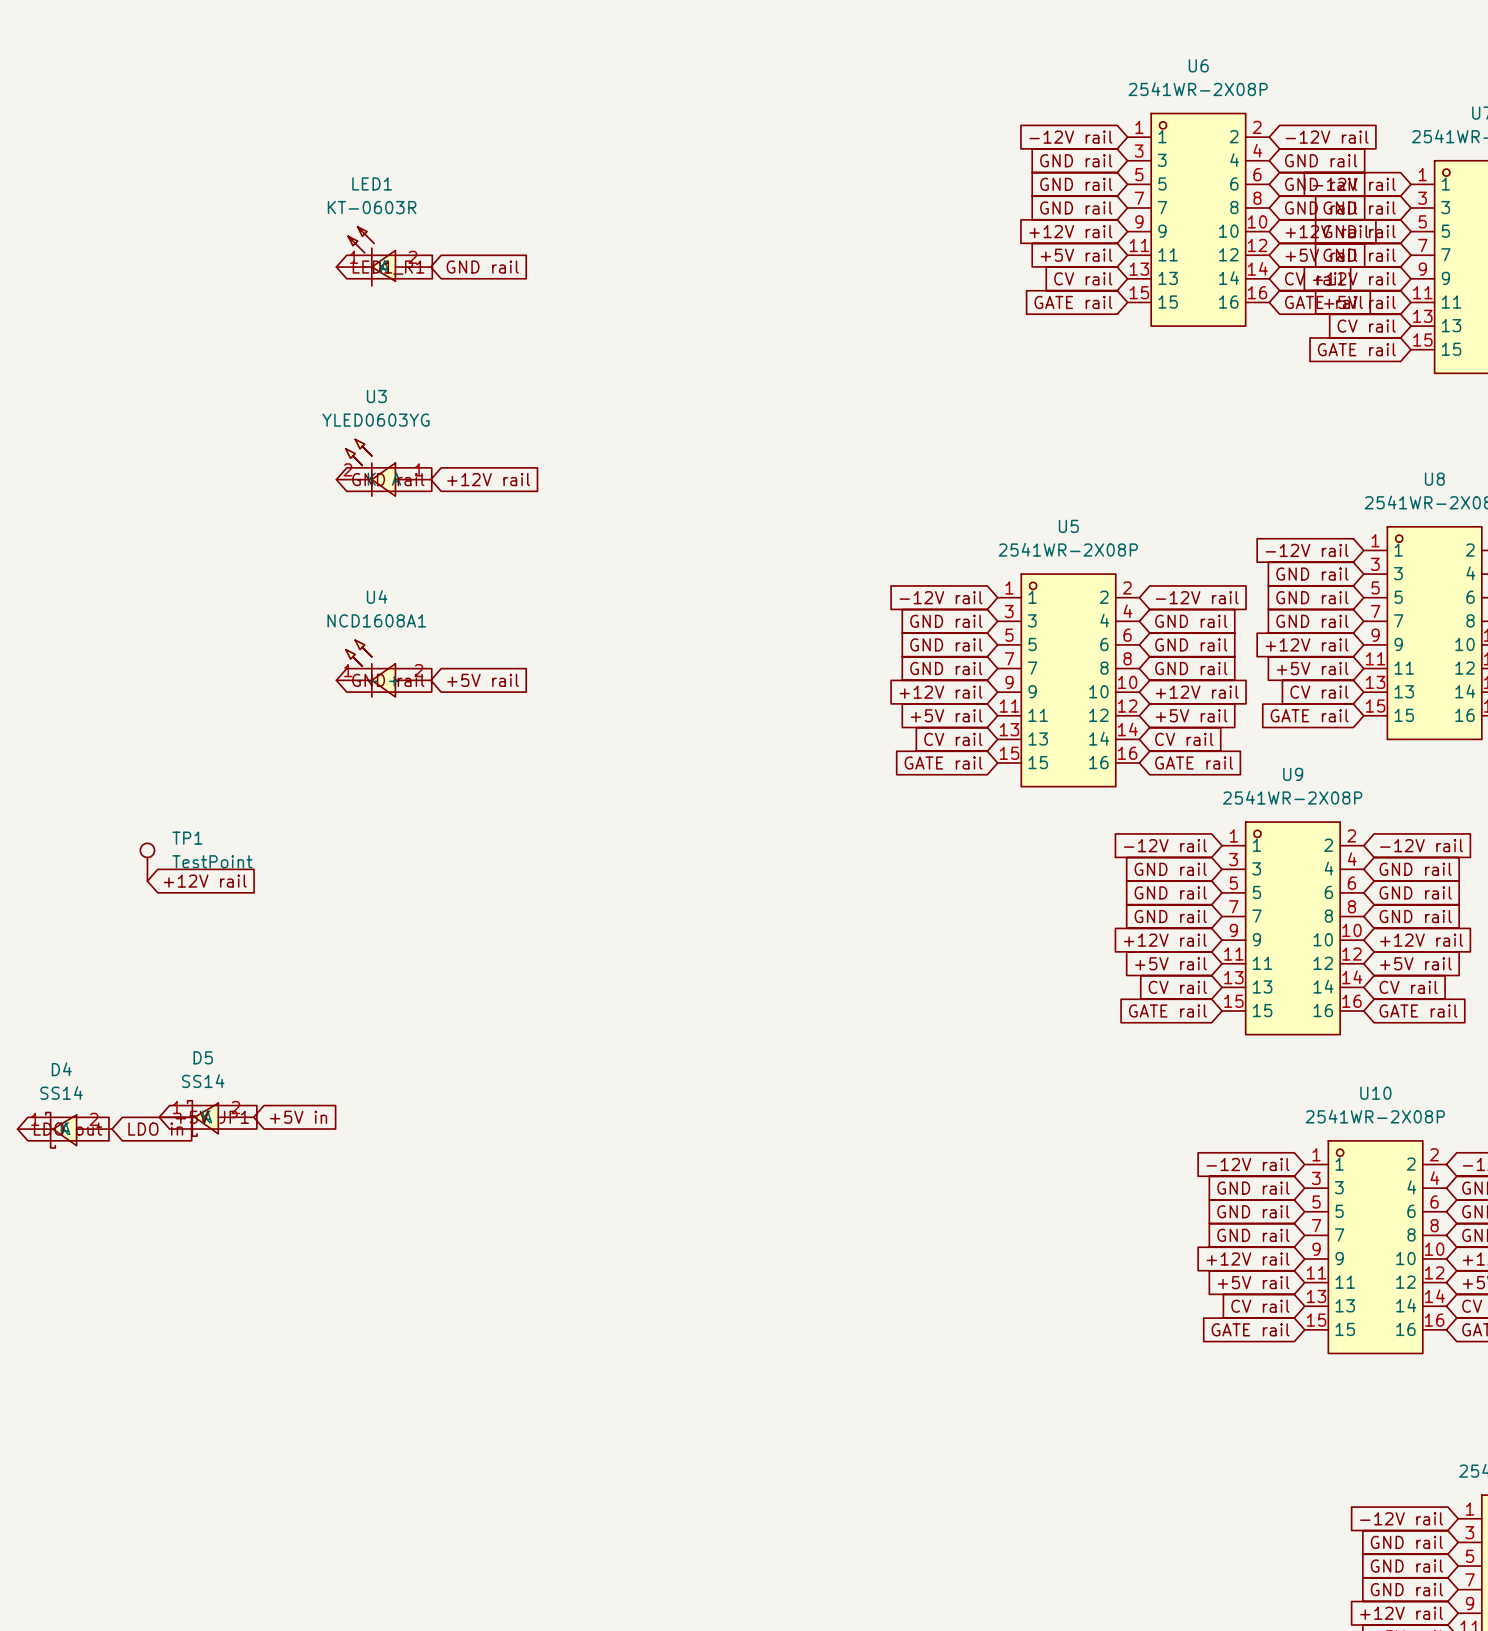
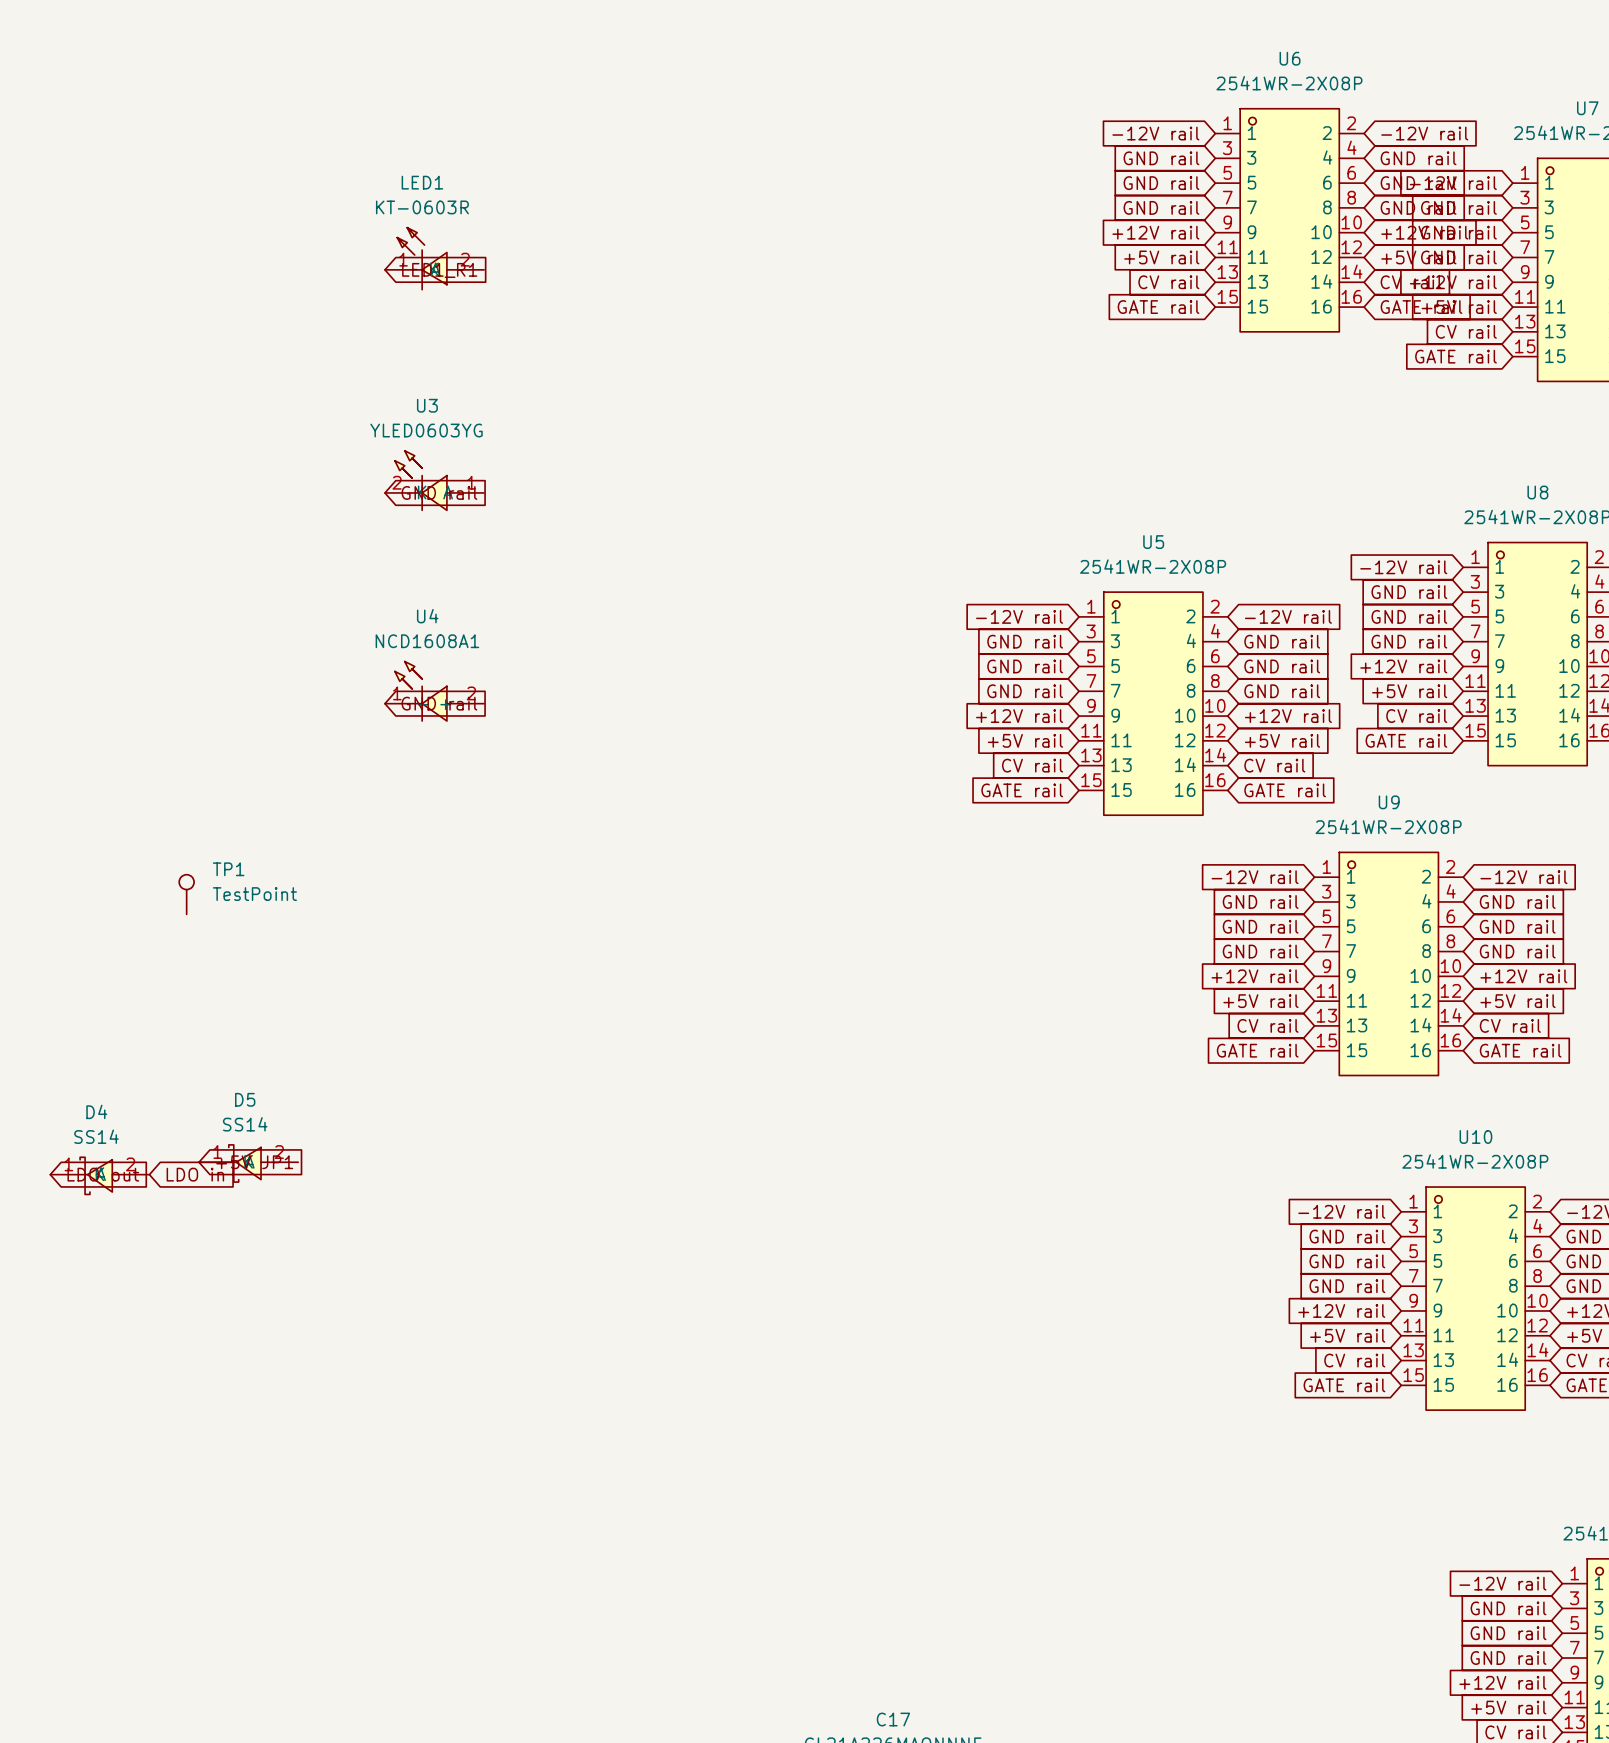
global label: GND rail (482, 267) -> none
global label: +12V rail (488, 479) -> none
global label: +5V rail (483, 680) -> none
global label: +12V rail (205, 881) -> none
global label: +5V in (298, 1117) -> none

